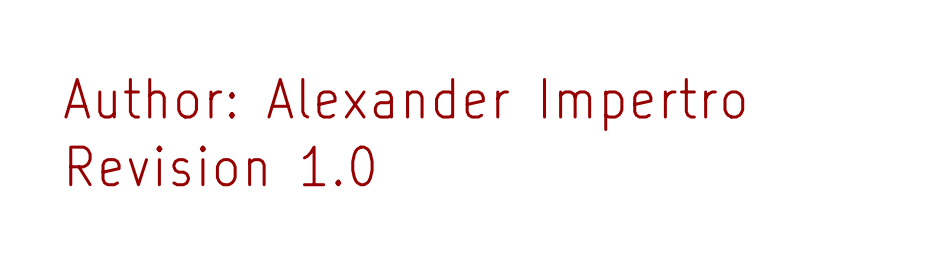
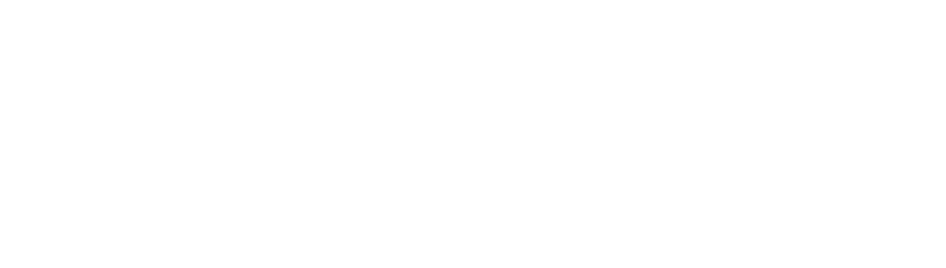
text: Author: Alexander Impertro (404, 104) -> none
text: Revision 1.0 (221, 165) -> none

